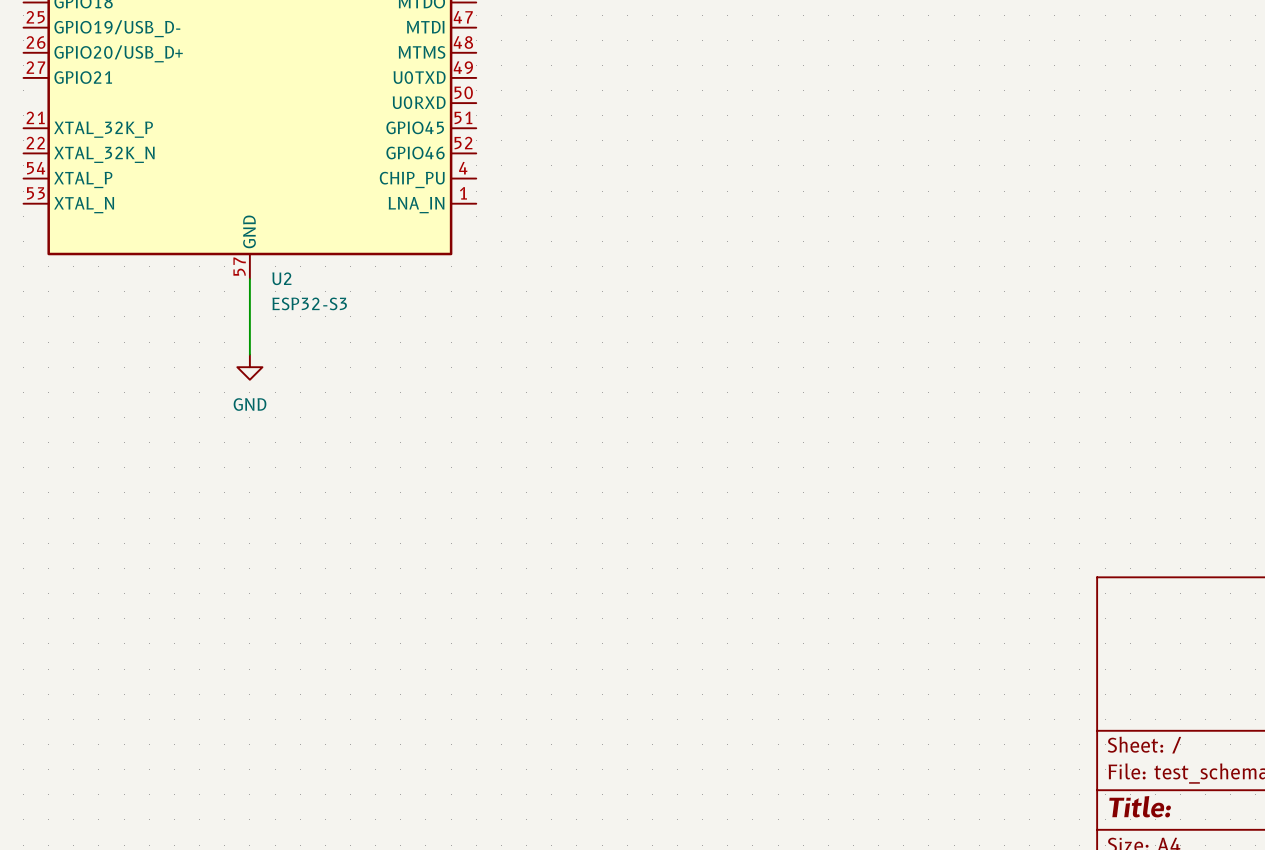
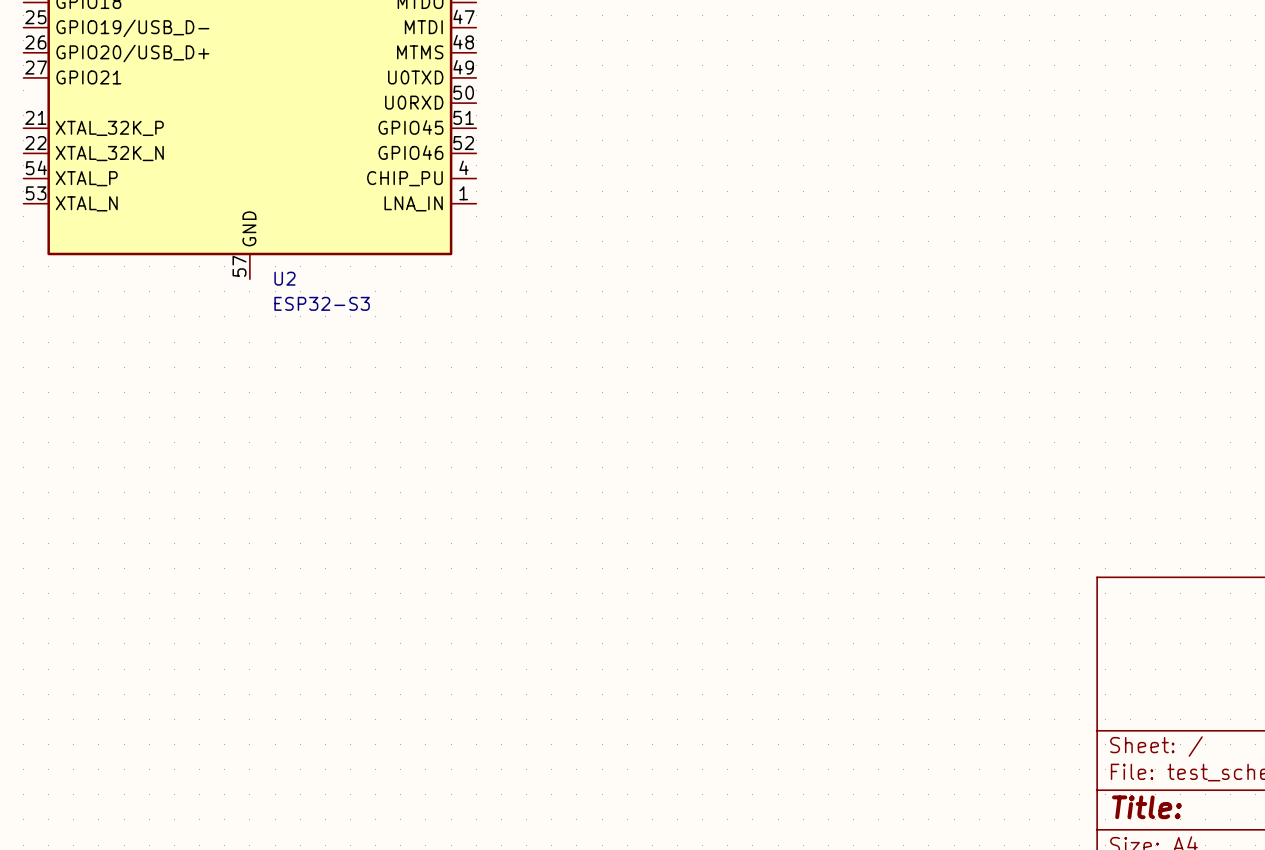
wire: (249, 279) (249, 354) -> none
power symbol: GND (249, 367) -> none

